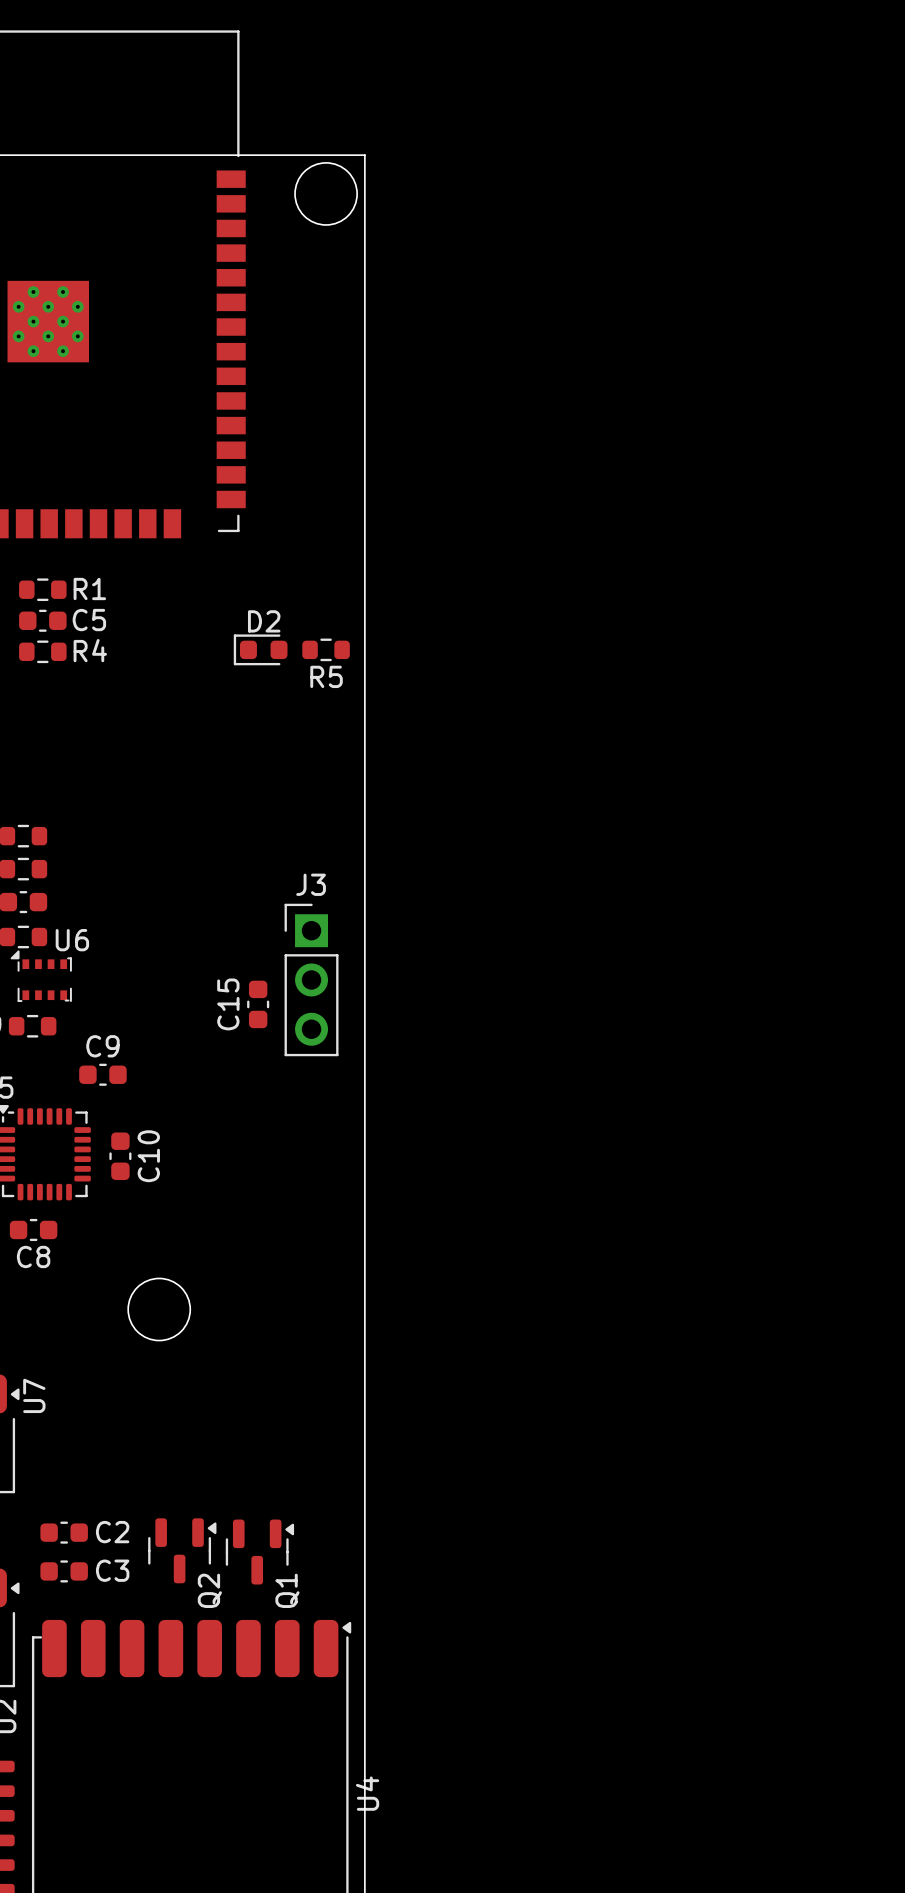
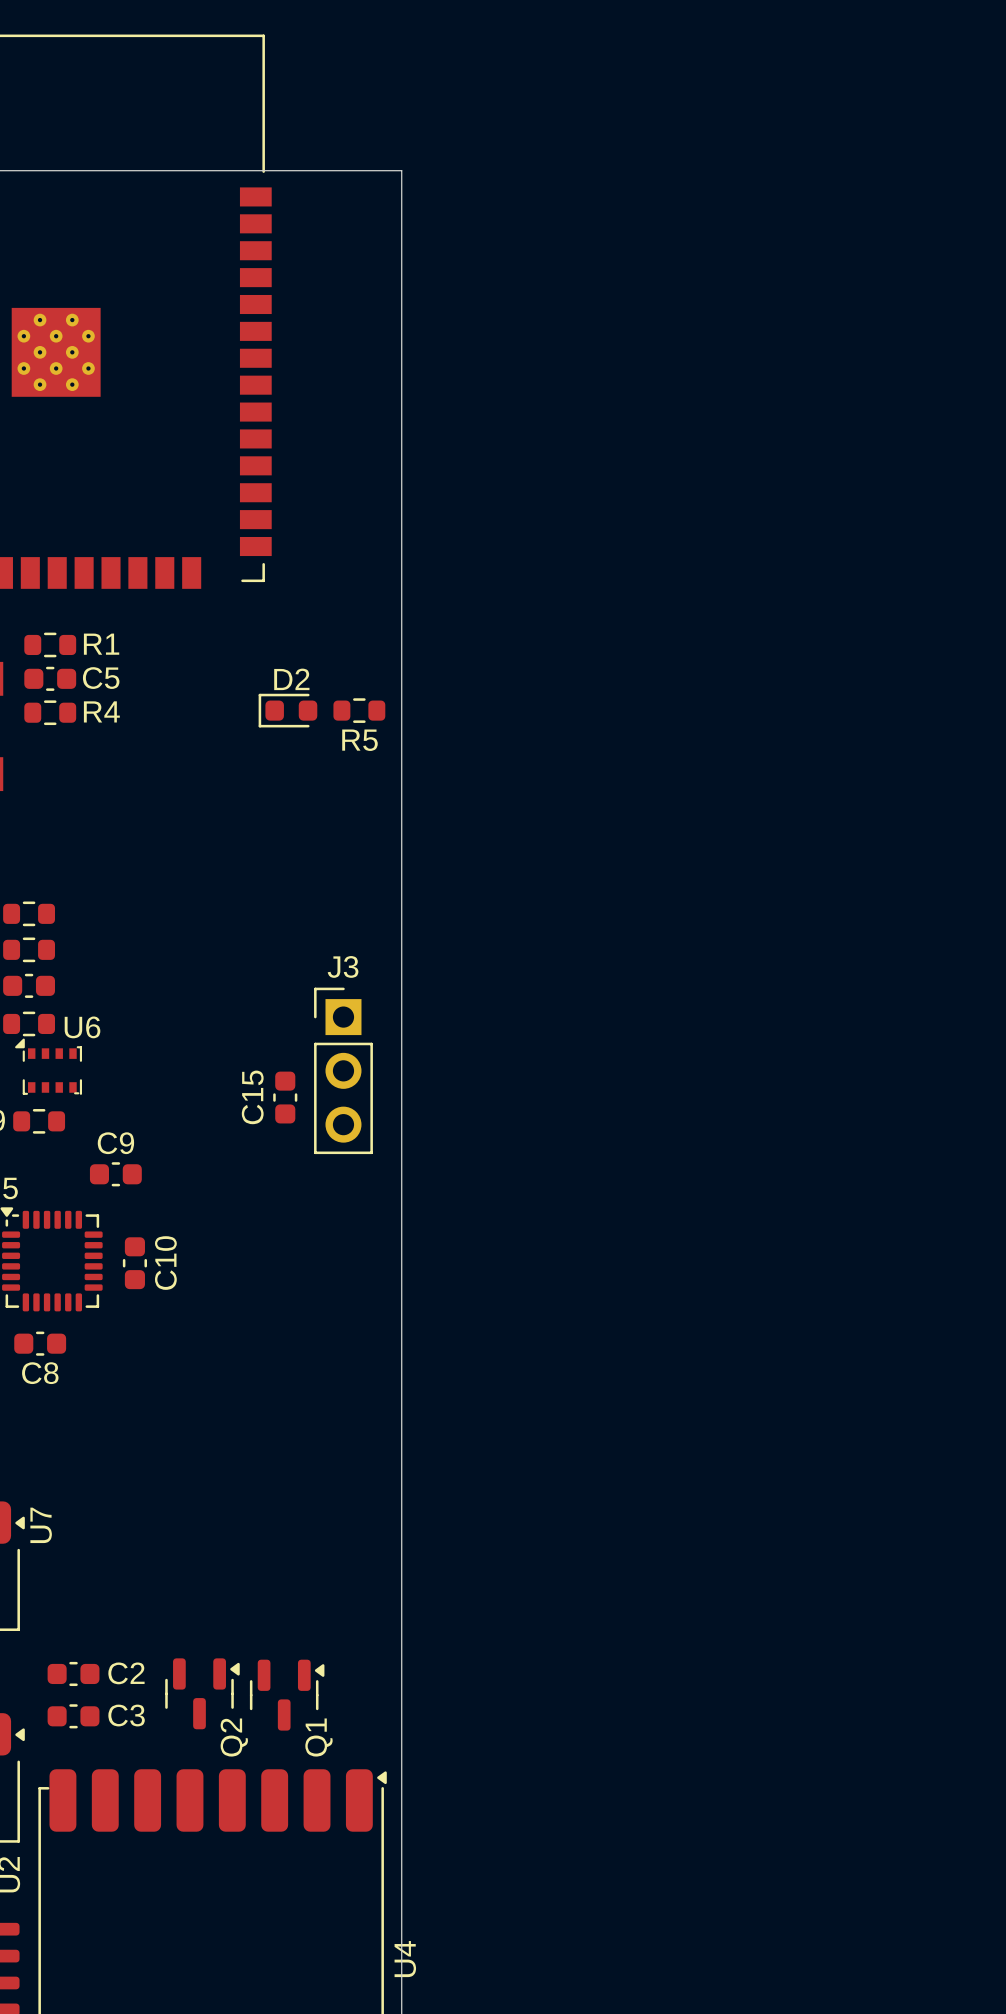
round board edge: [294, 162, 358, 226] -> none
round board edge: [127, 1277, 191, 1342] -> none

